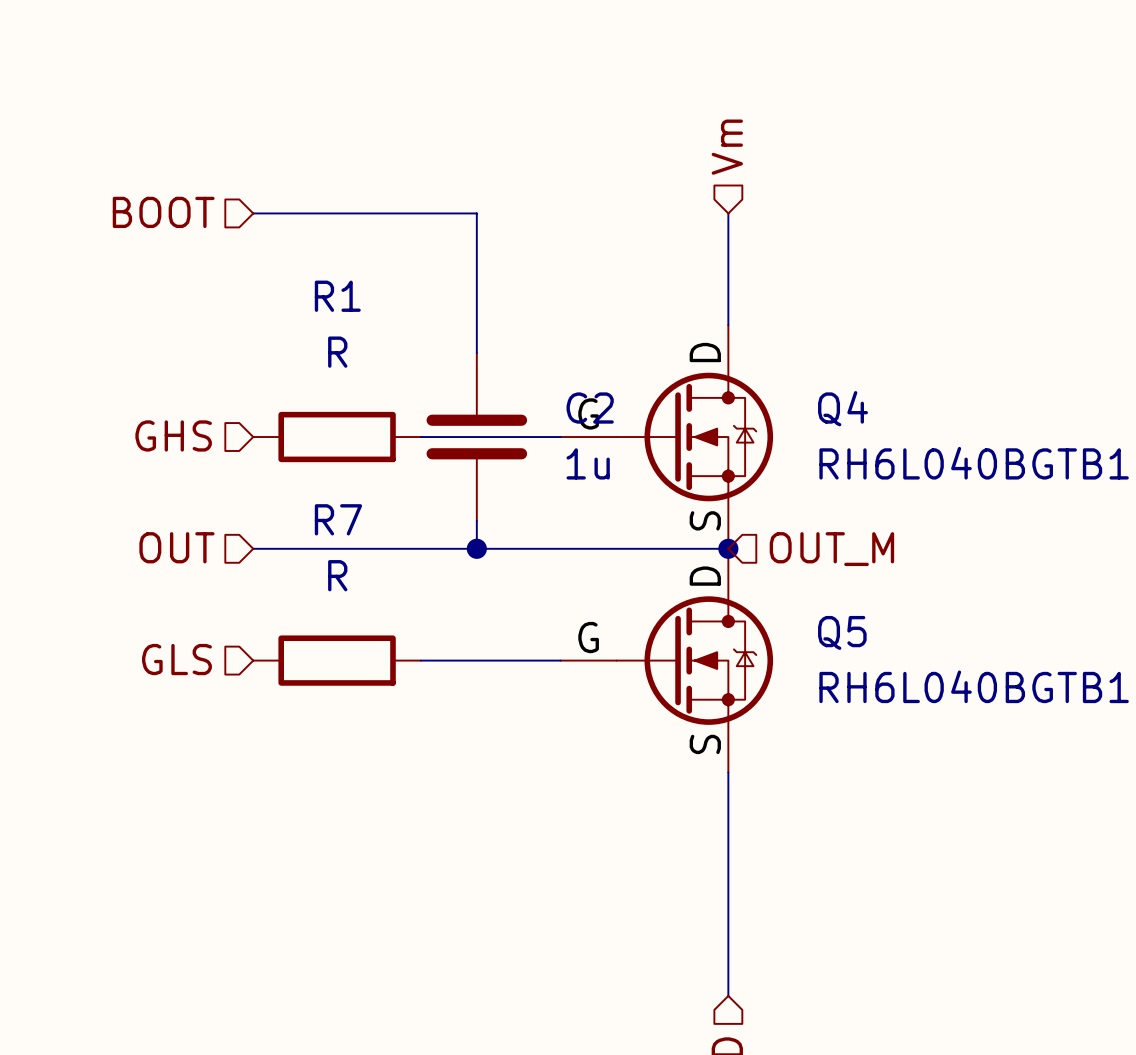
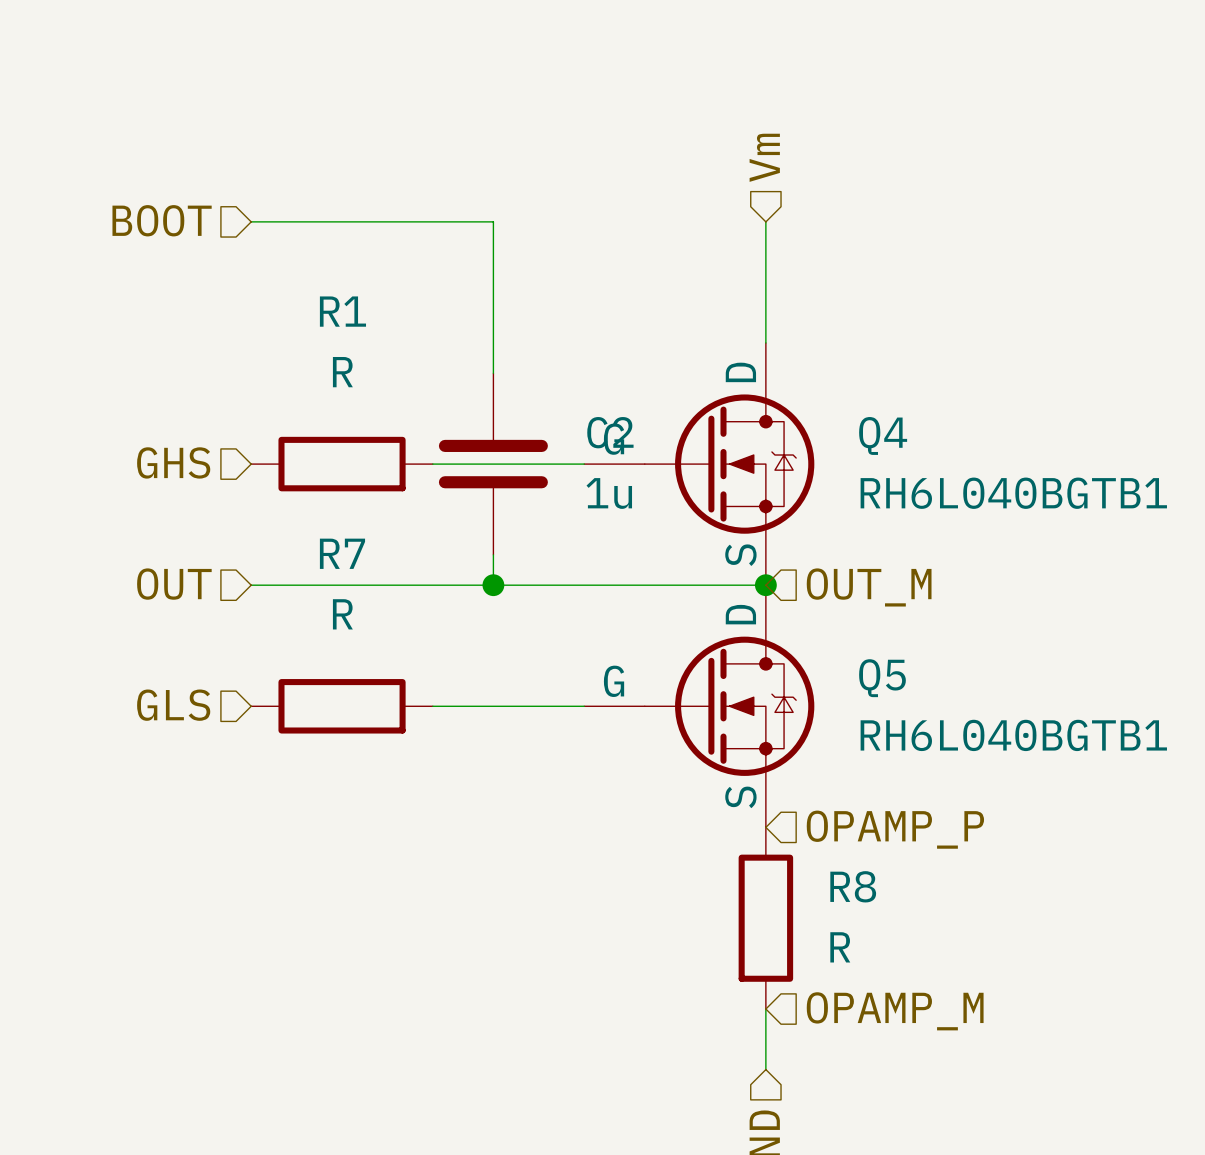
wire: (728, 772) (728, 940) -> none
hierarchical label: none -> OPAMP_P (895, 829)
R8: none -> R (765, 918)
hierarchical label: none -> OPAMP_M (895, 1011)

